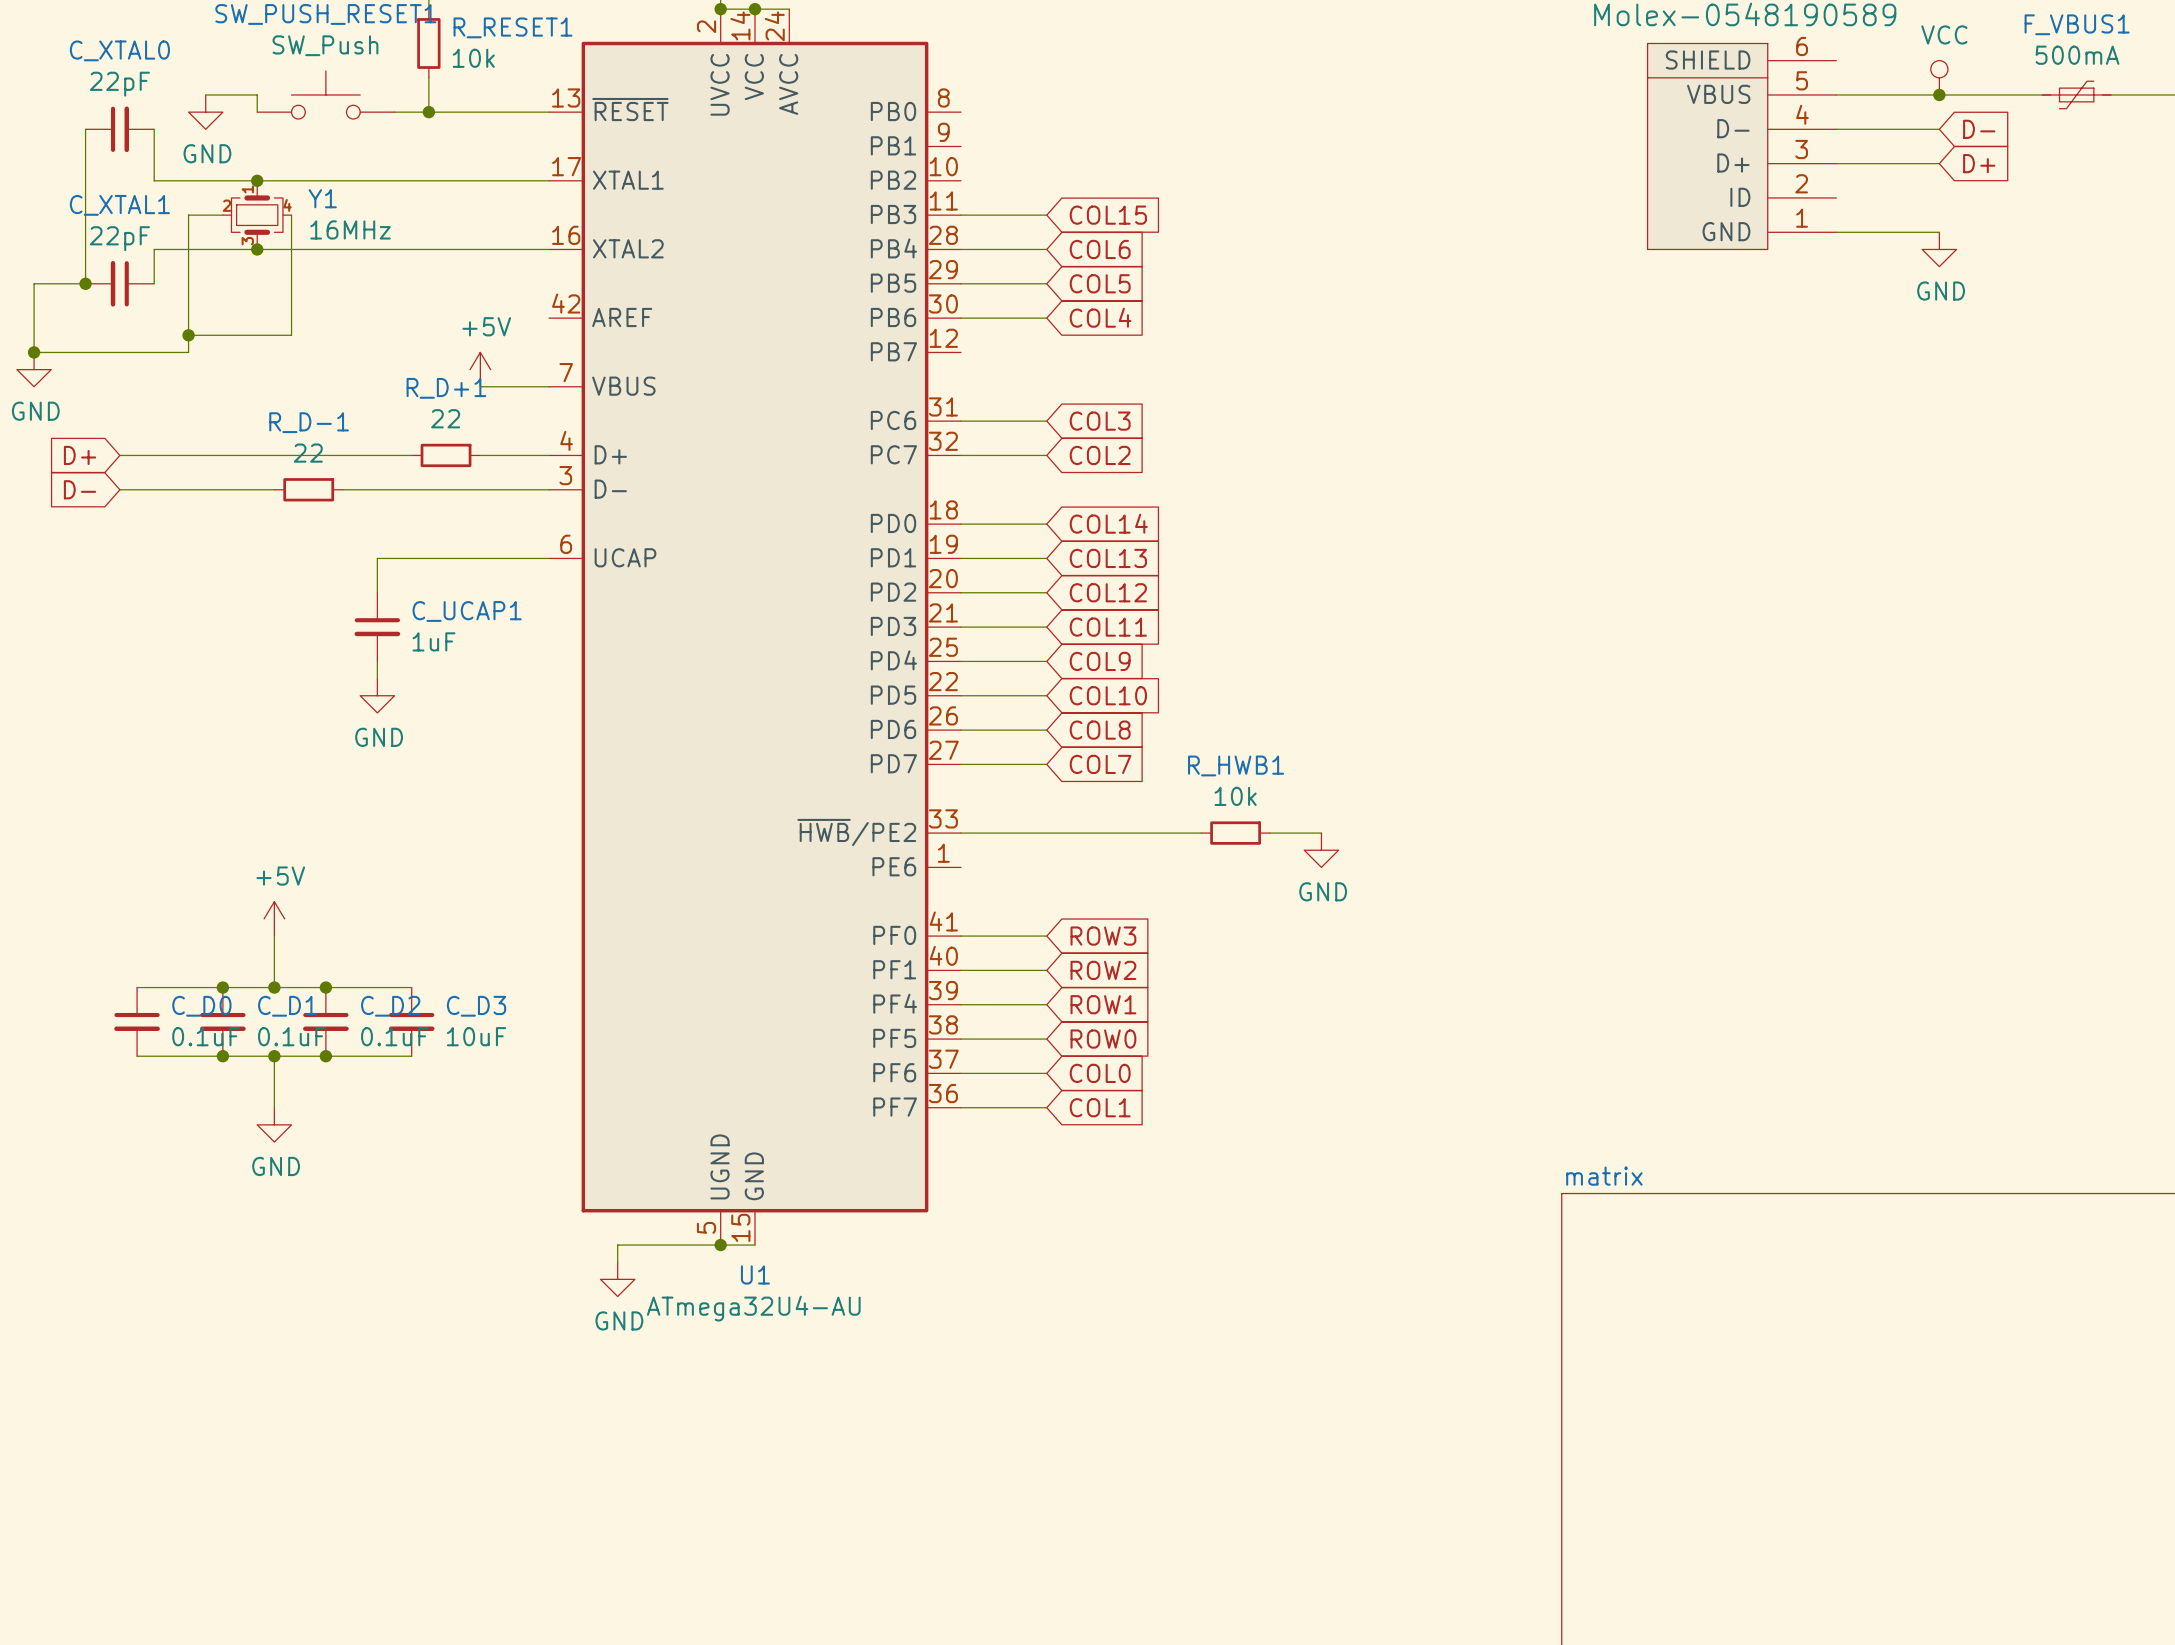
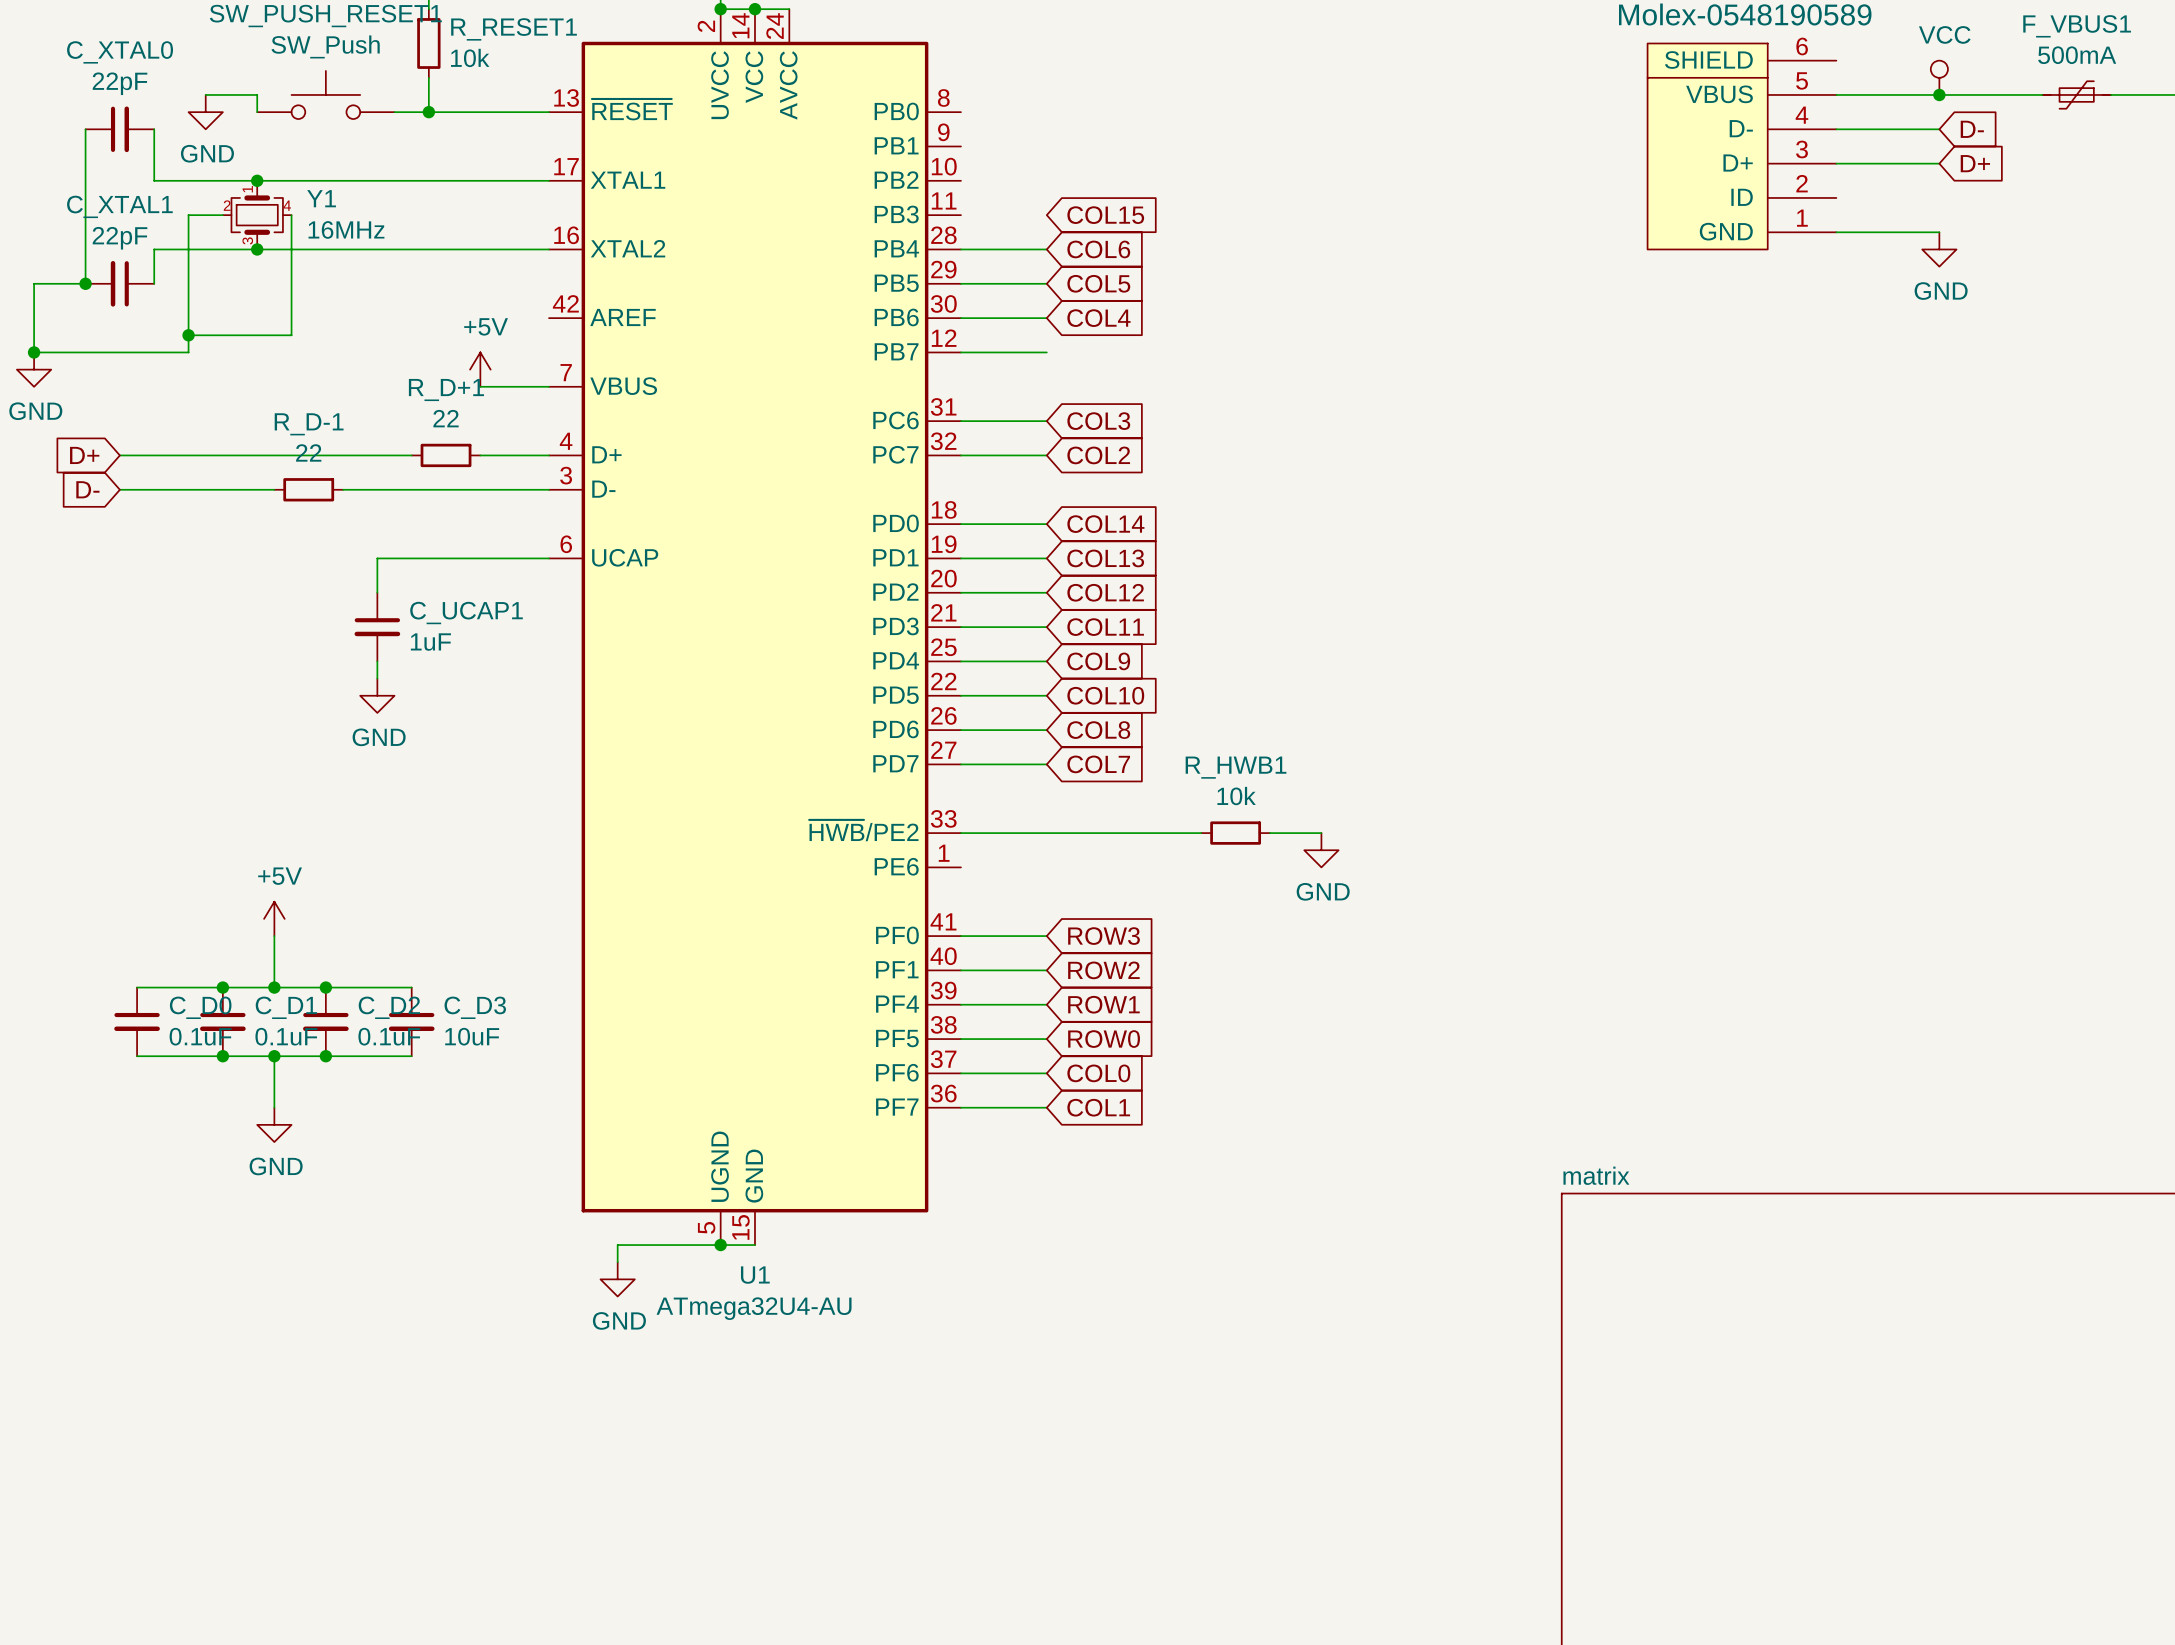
wire: (960, 215) (1046, 215) -> (960, 352) (1046, 352)

